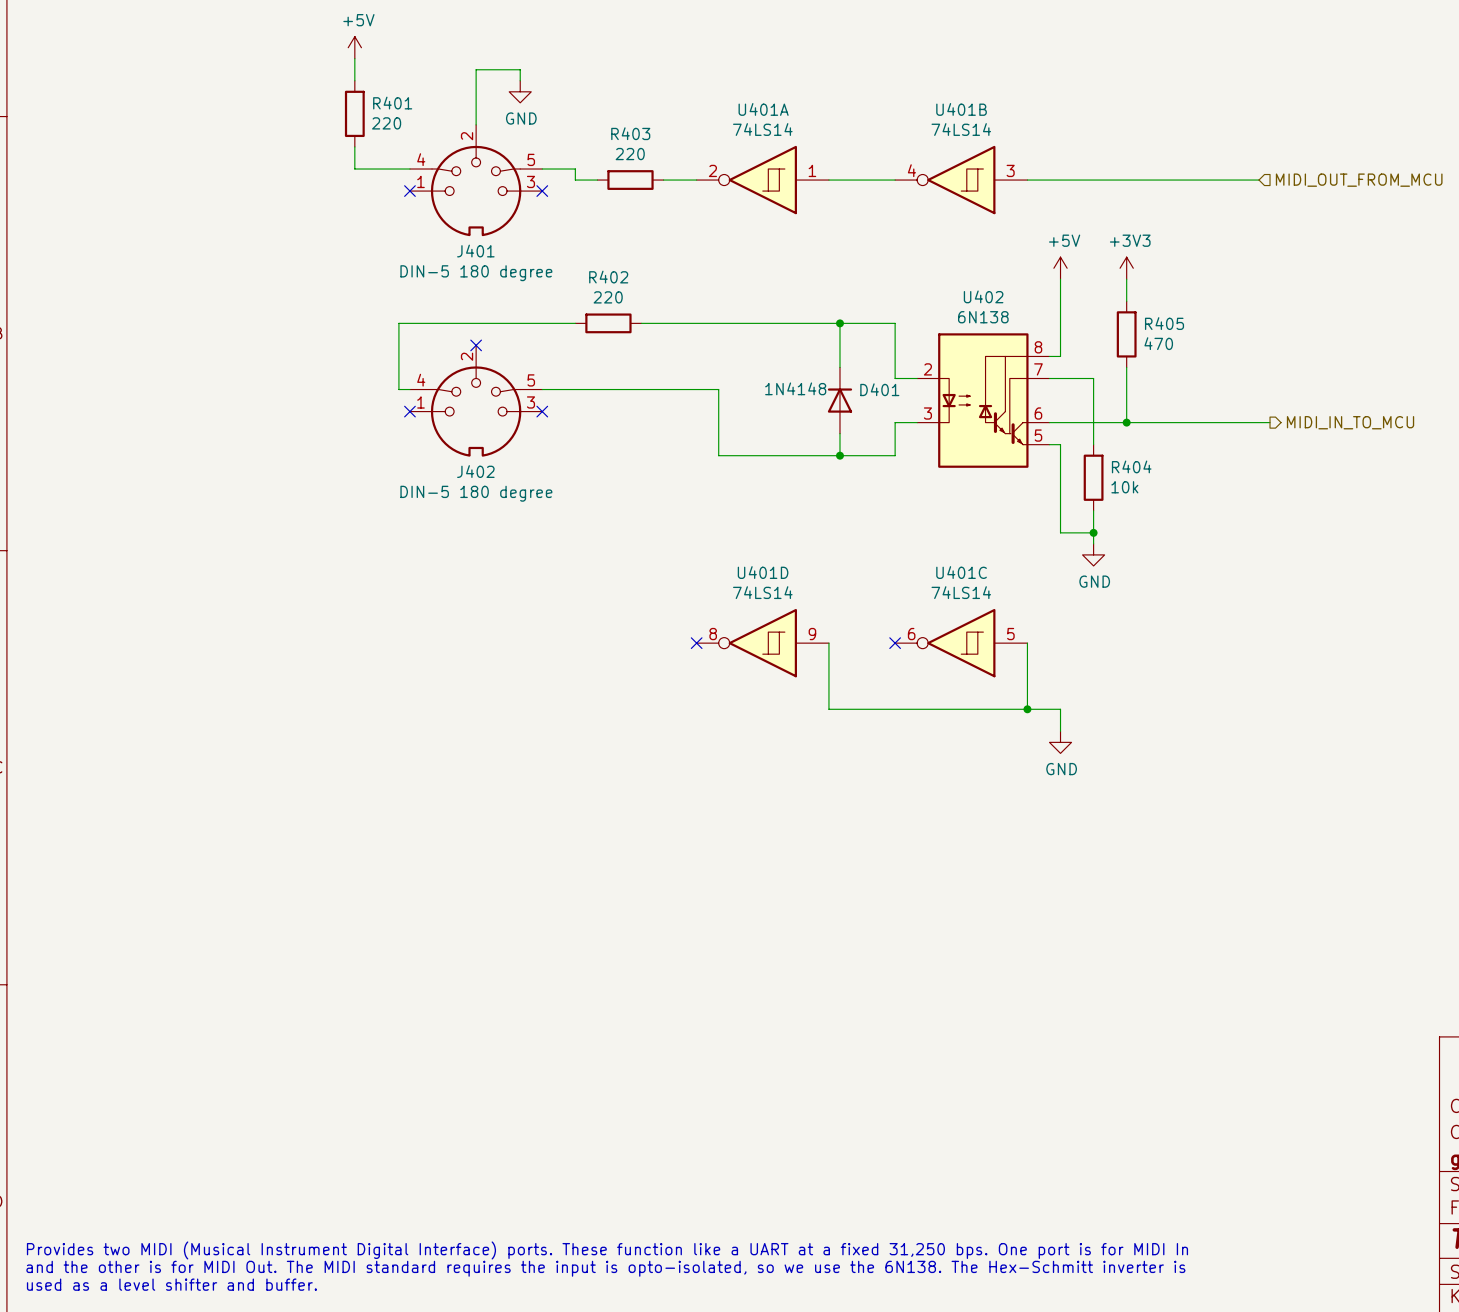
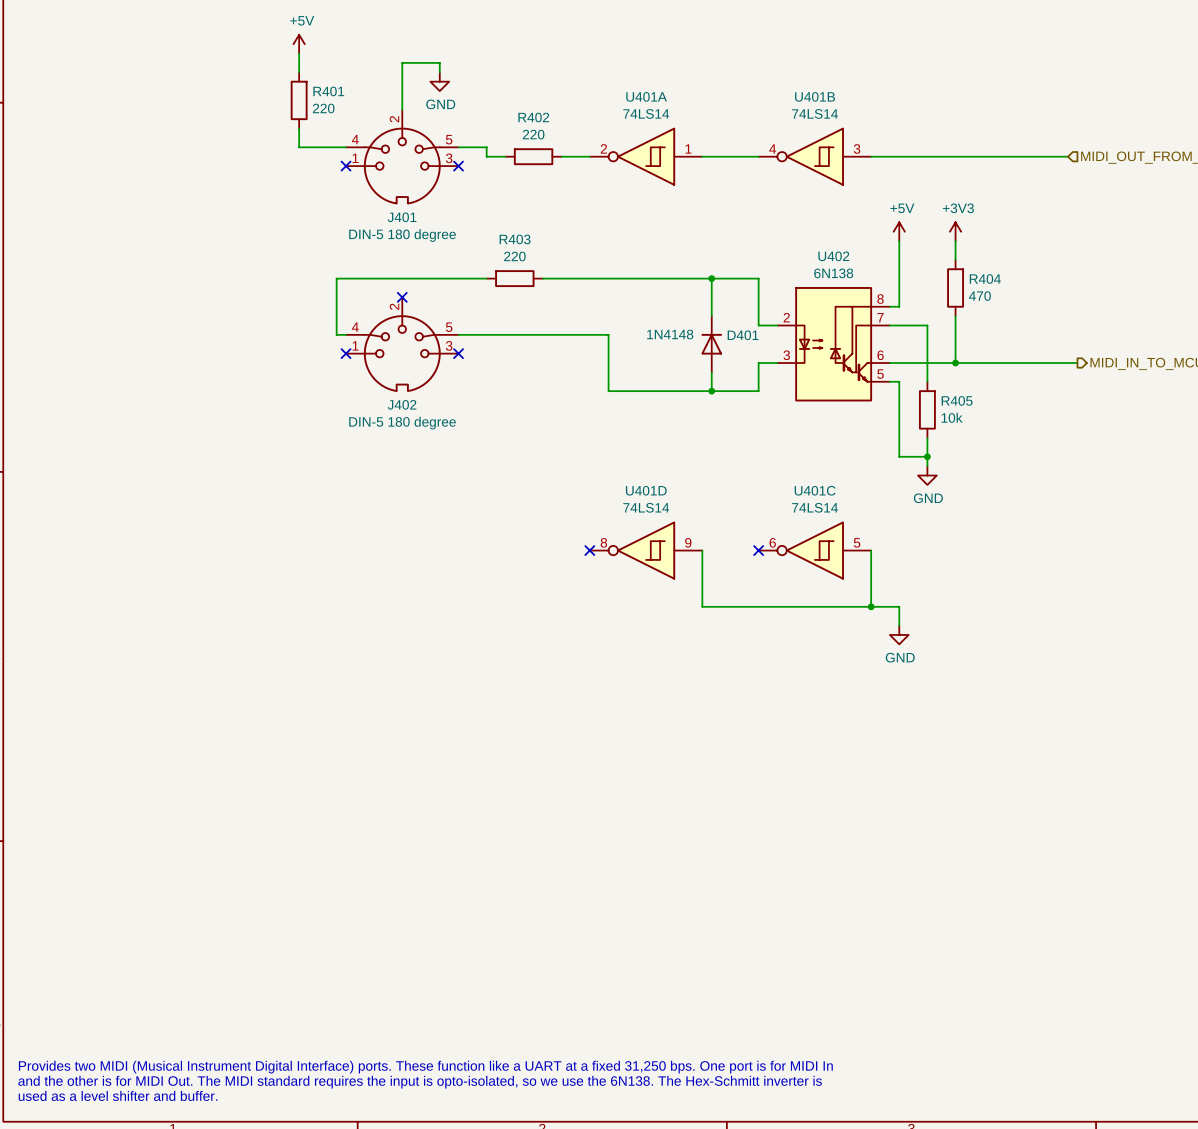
R403 name: R403 (630, 133) -> R402 (533, 117)
R402 name: R402 (608, 277) -> R403 (515, 239)
R405 name: R405 (1164, 323) -> R404 (985, 279)
R404 name: R404 (1131, 466) -> R405 (957, 400)

